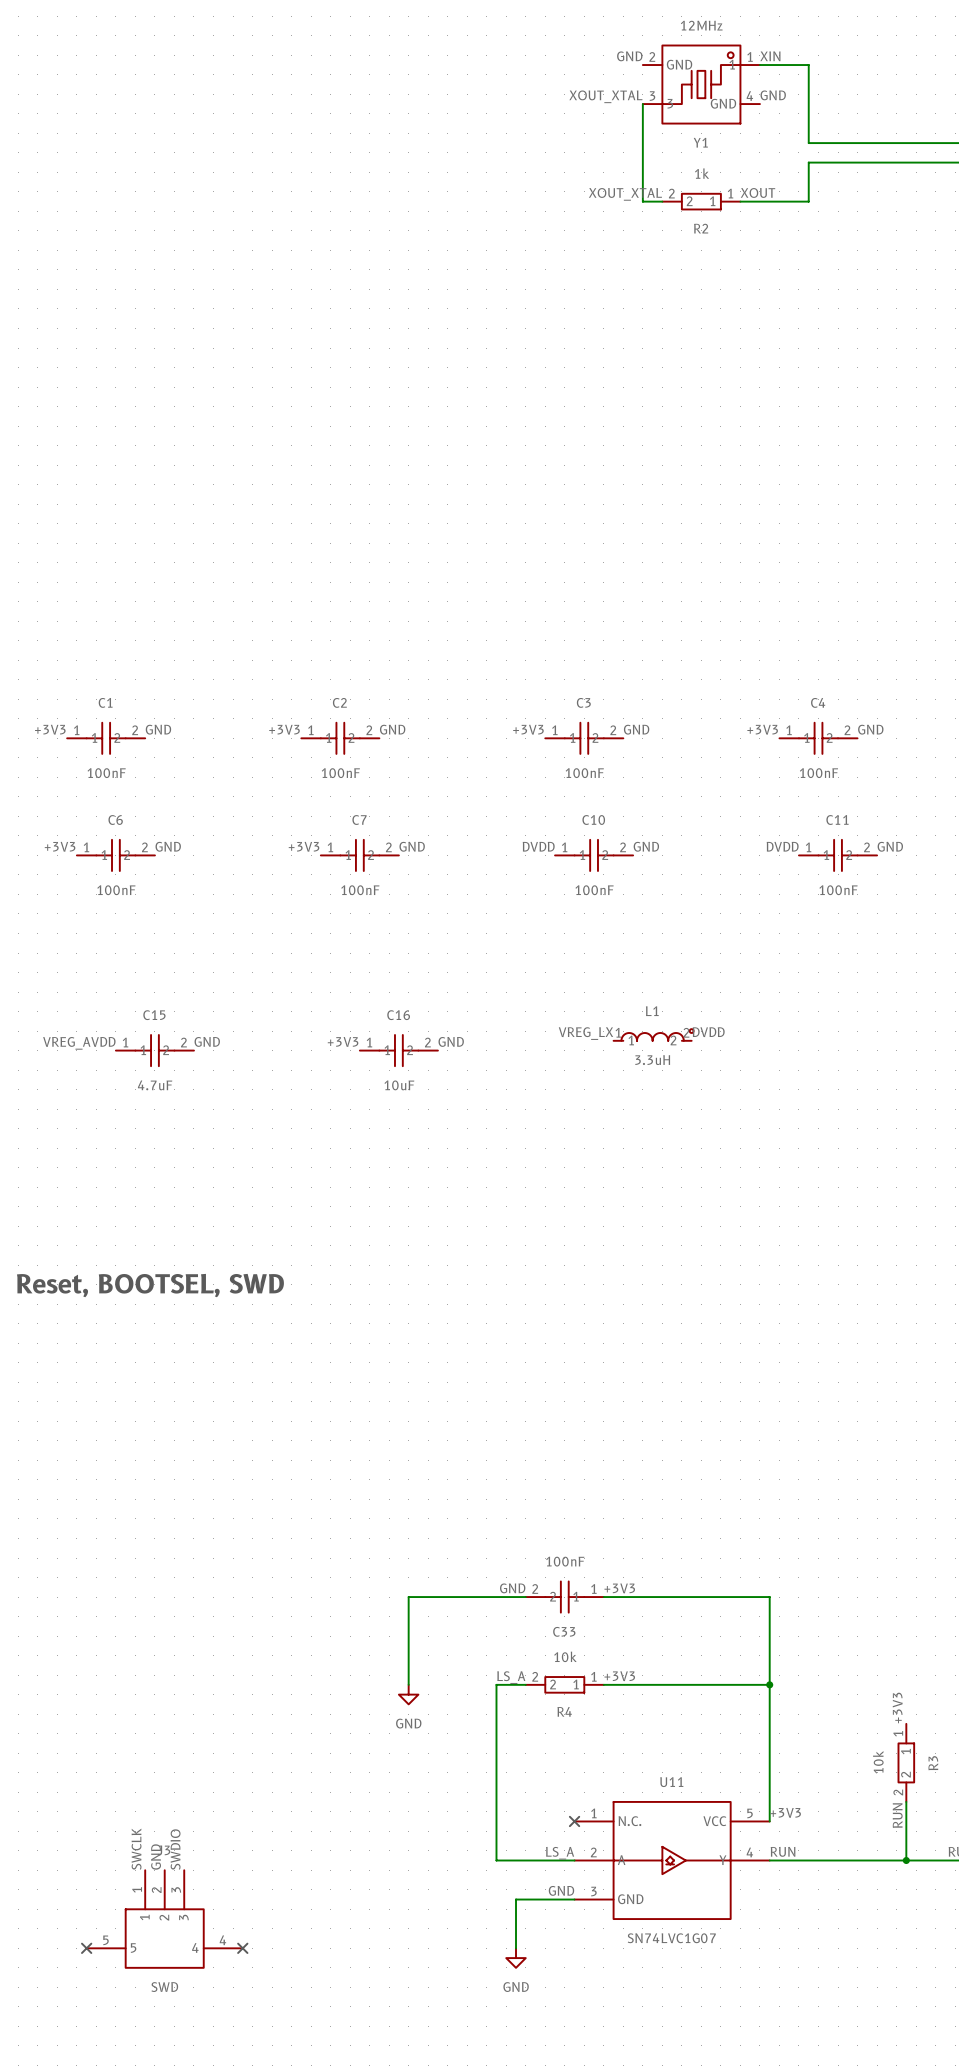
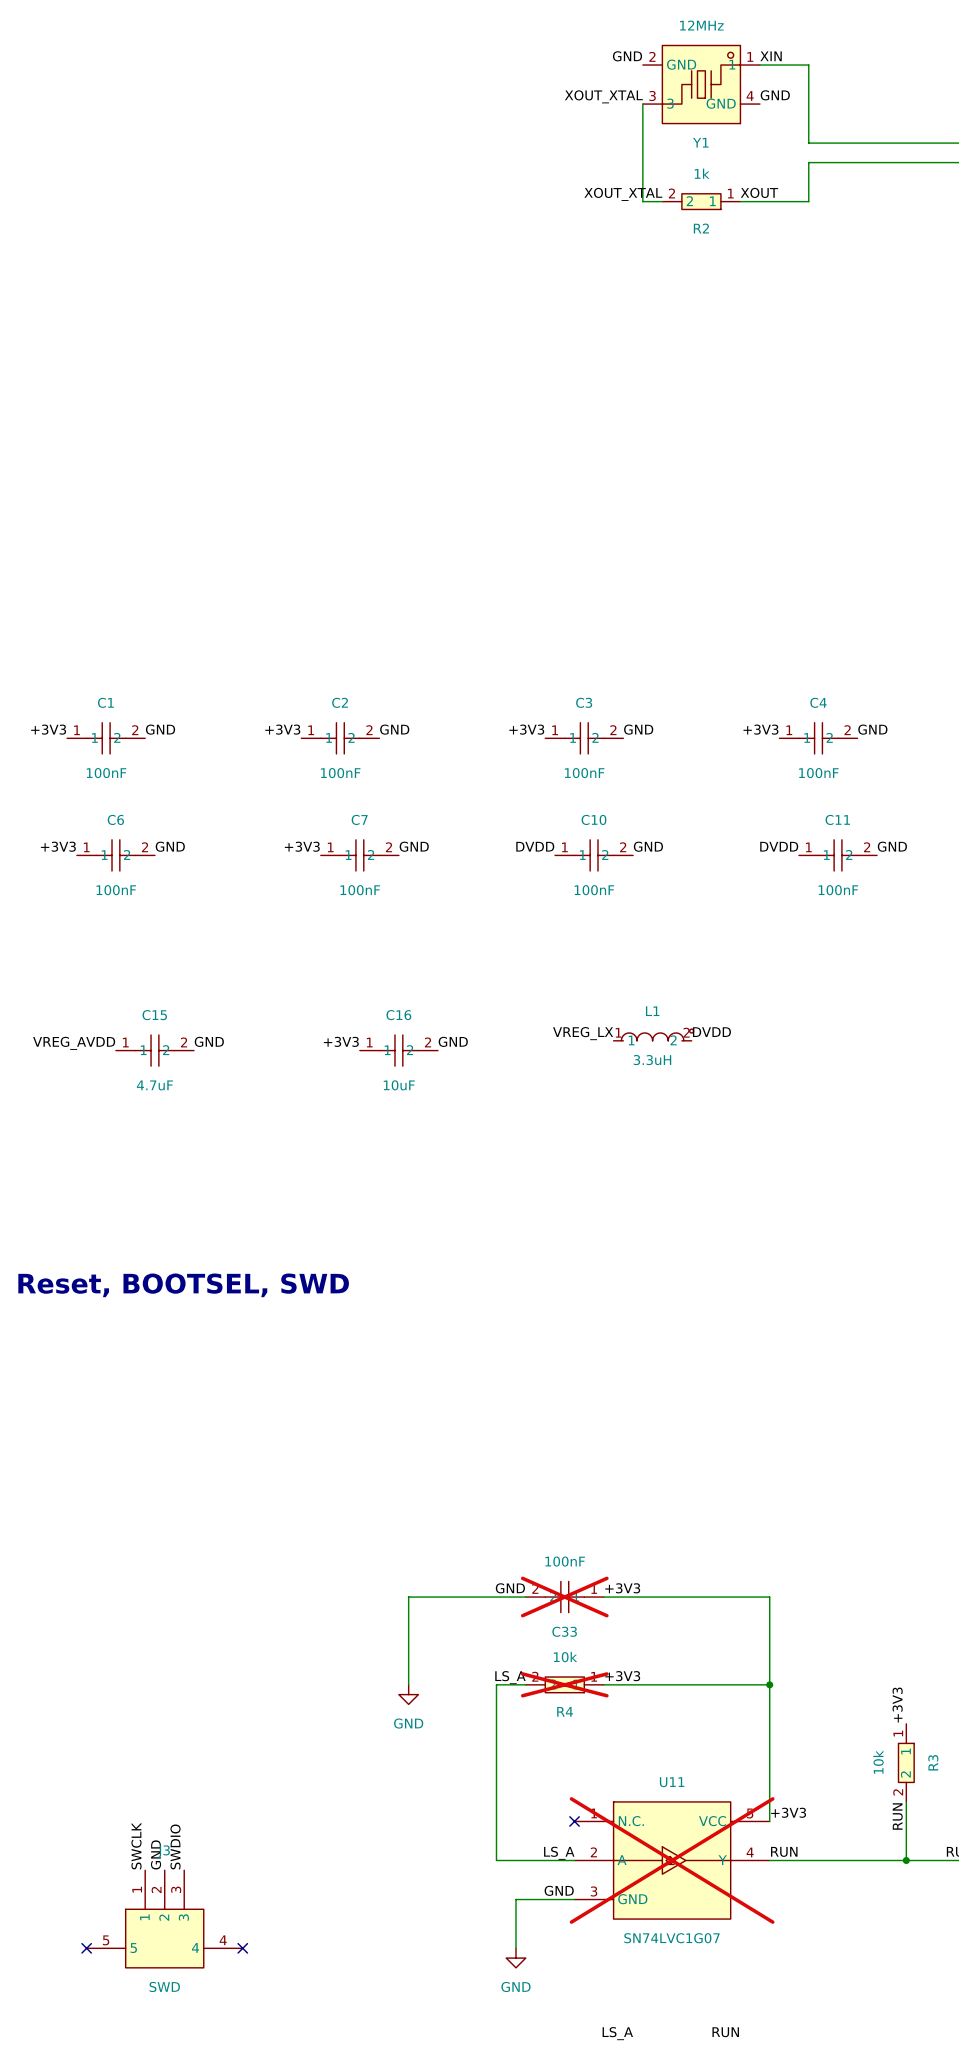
C33 do-not-place cross: none -> (564, 1597)
R4 do-not-place cross: none -> (564, 1684)
U11 do-not-place cross: none -> (672, 1860)
label: none -> RUN (725, 2032)
label: none -> LS_A (617, 2033)

